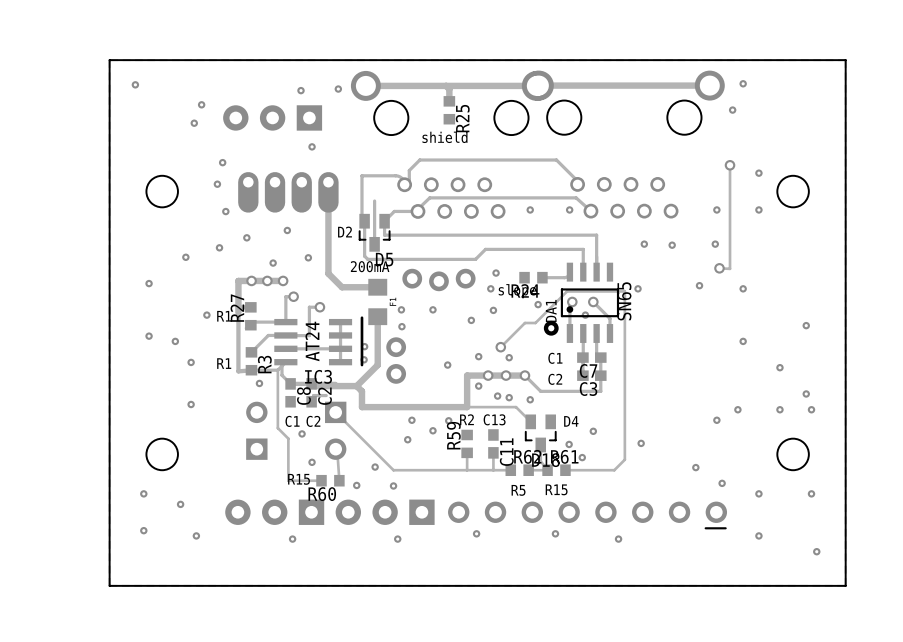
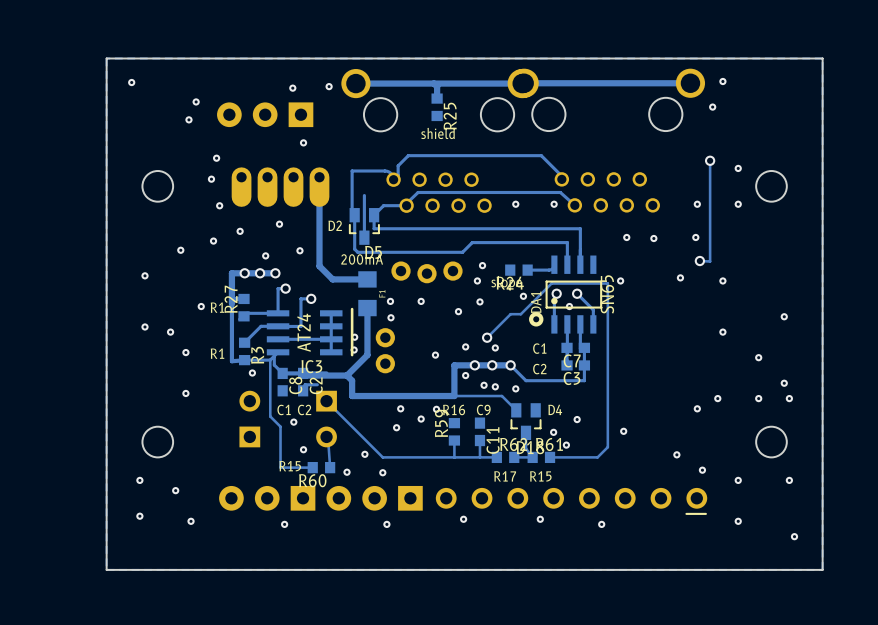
text: R2 (466, 419) -> R16 (454, 409)
text: C13 (494, 419) -> C9 (483, 409)
text: R5 (518, 490) -> R17 (505, 476)

